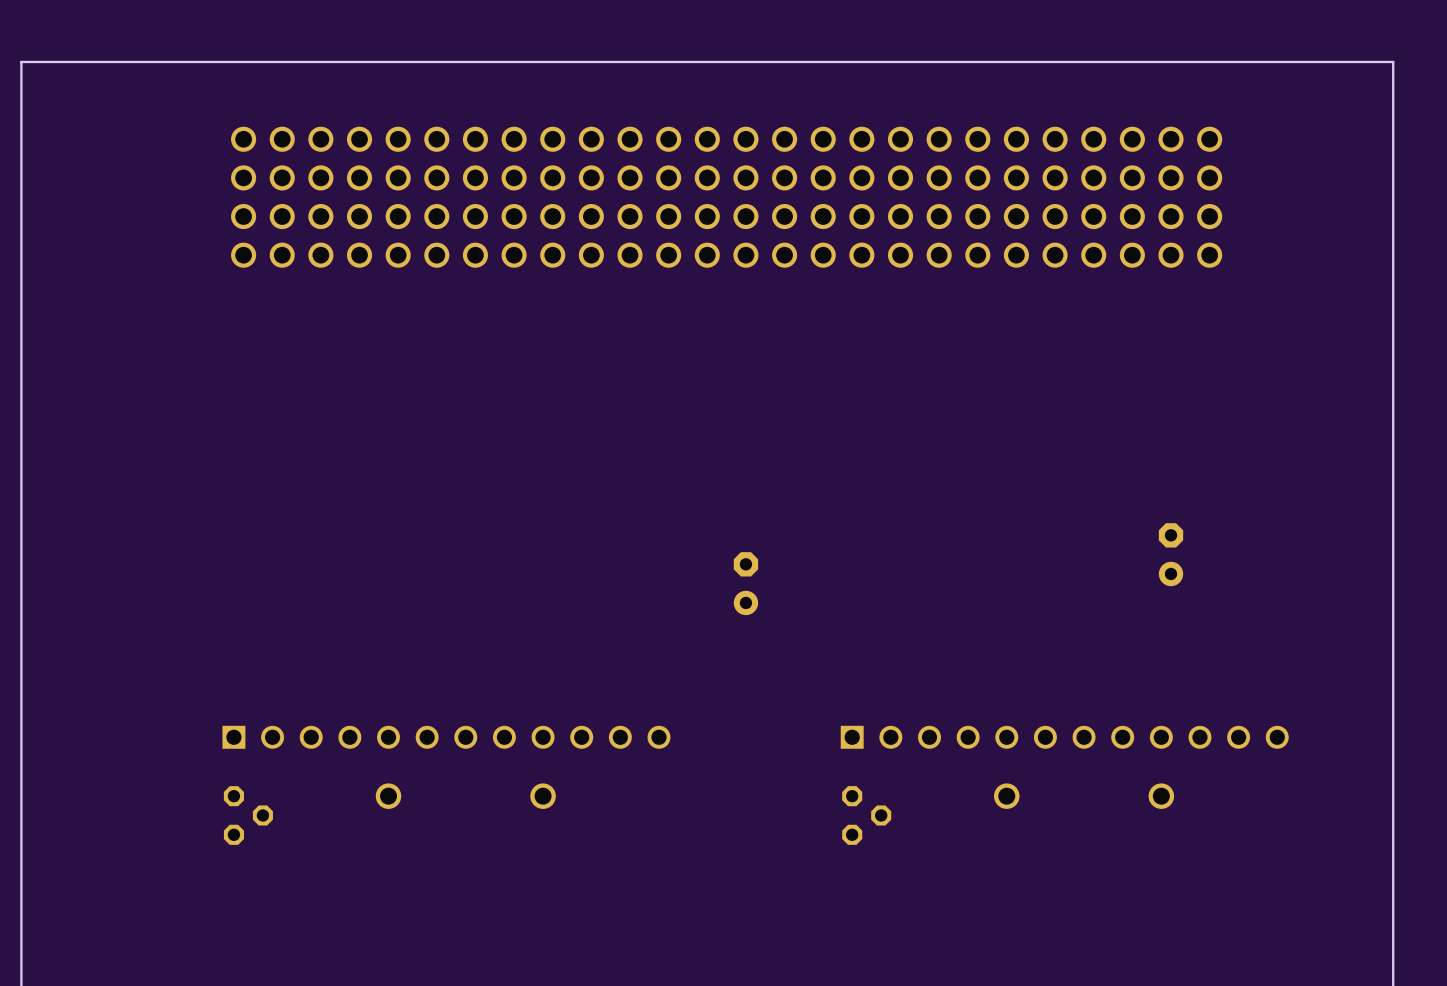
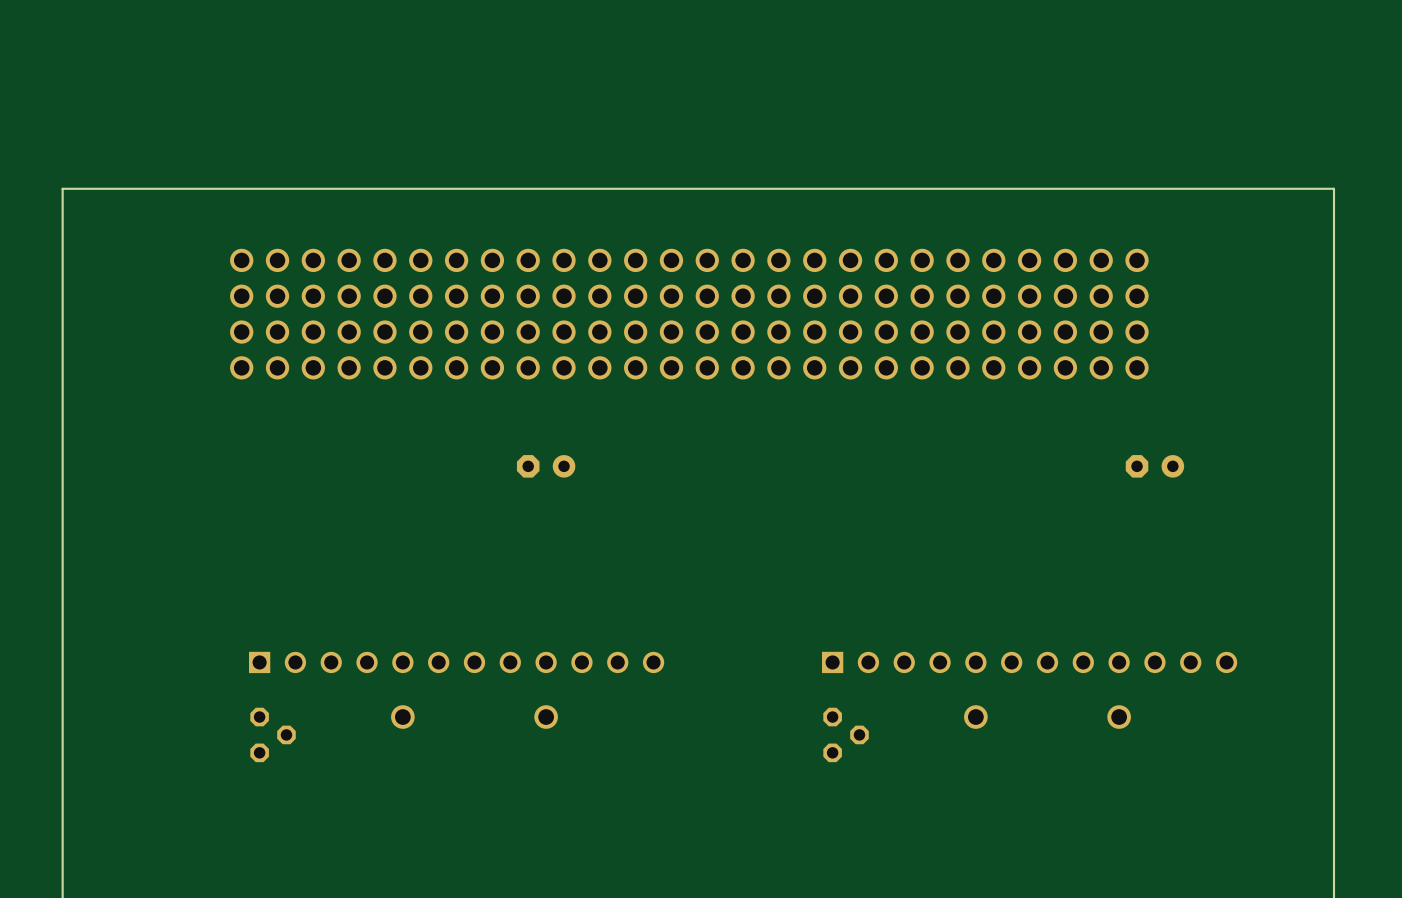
part: (726, 158) -> none
board edge: (1393, 226) (1393, 61) (21, 61) (21, 226) -> (1334, 188) (62, 188)
part: (726, 235) -> none
part: none -> (689, 278)
part: none -> (689, 349)
part rotation: 0° (1171, 554) -> 90° counterclockwise (1154, 466)
part position: (1171, 554) -> (1154, 466)
part rotation: 0° (745, 583) -> 90° counterclockwise (546, 466)
part position: (745, 583) -> (546, 466)

